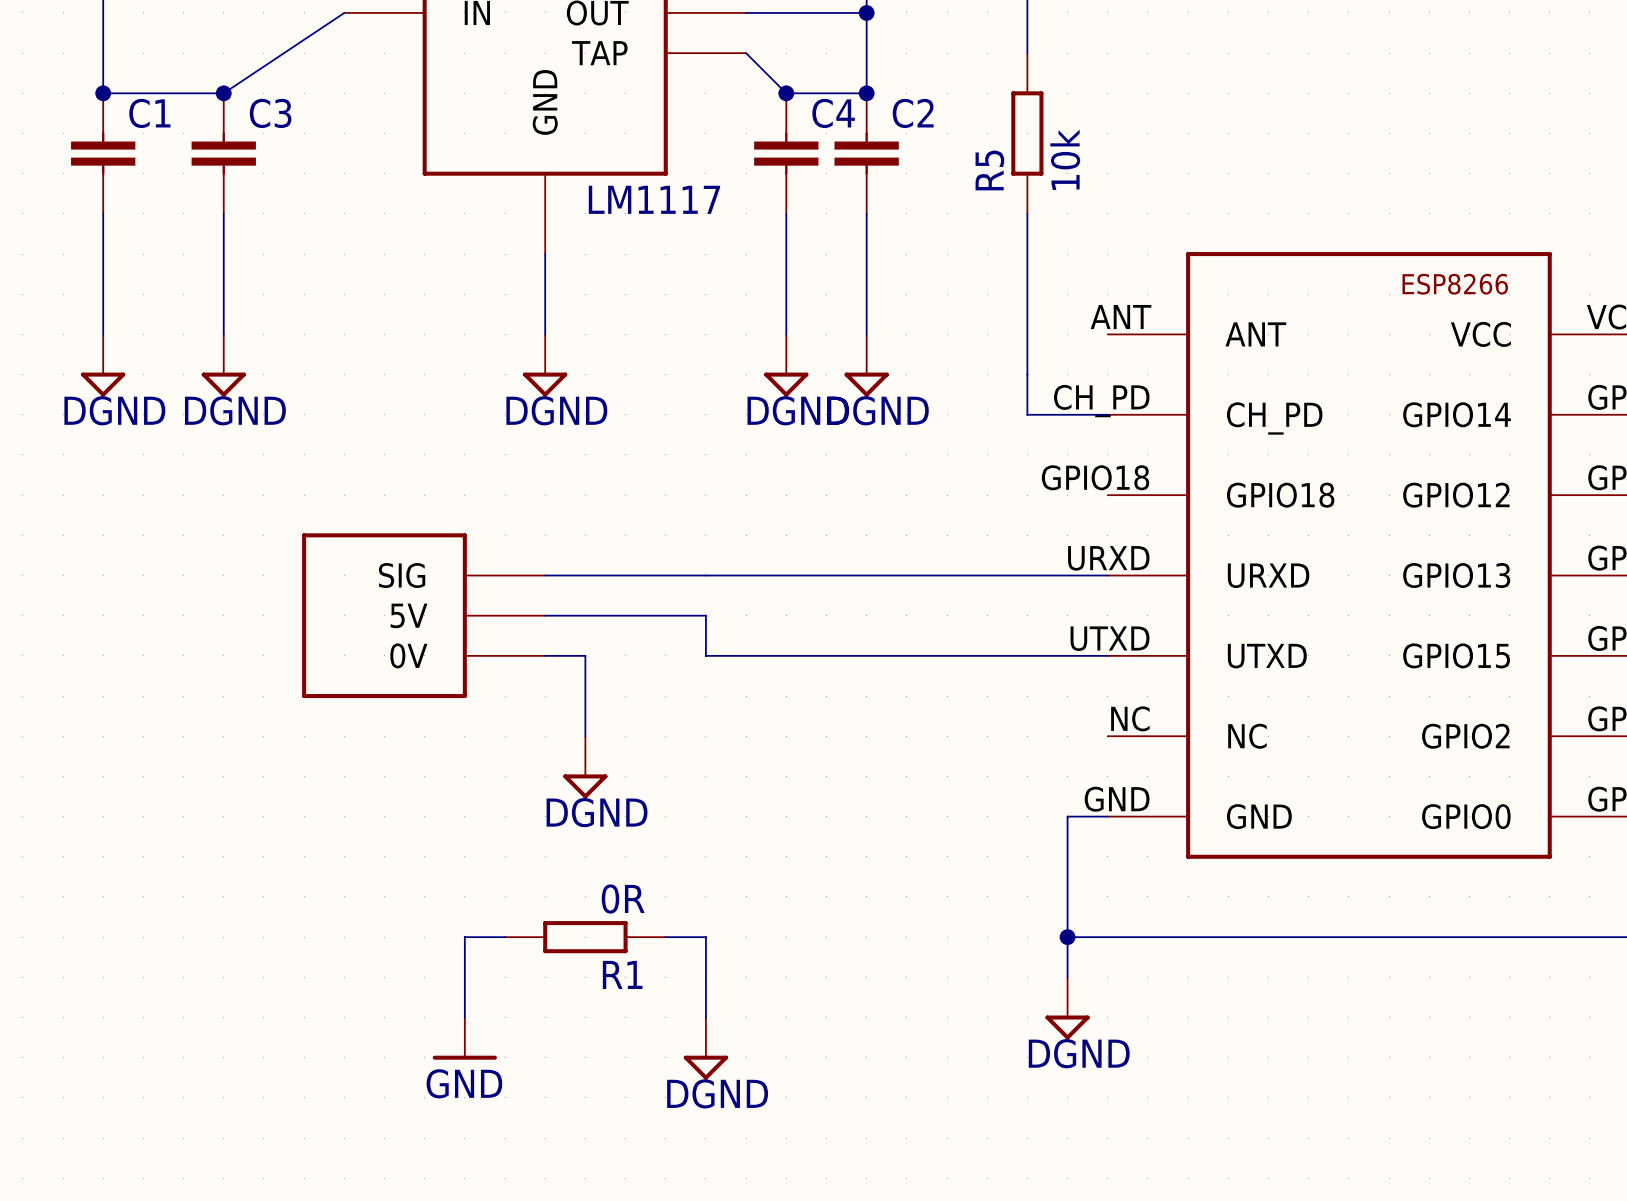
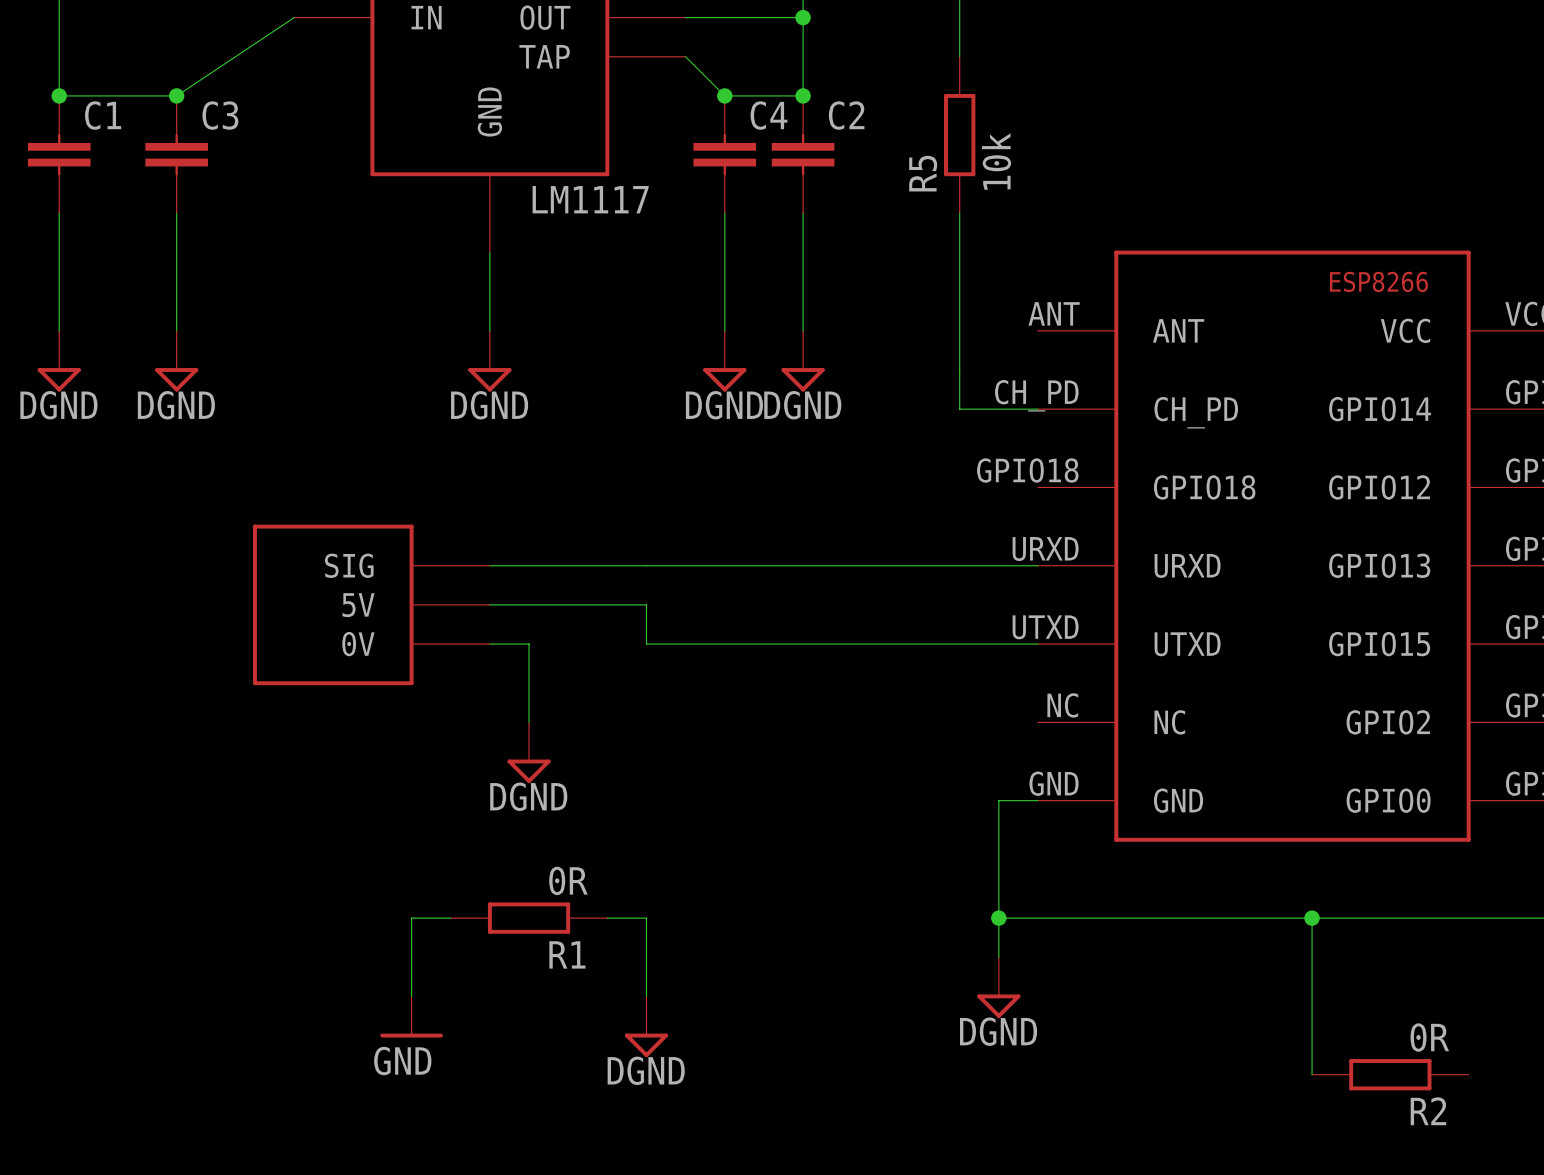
wire: none -> (1312, 918) (1312, 1074)
junction: none -> (1312, 918)
R2: none -> 0R (1390, 1074)

